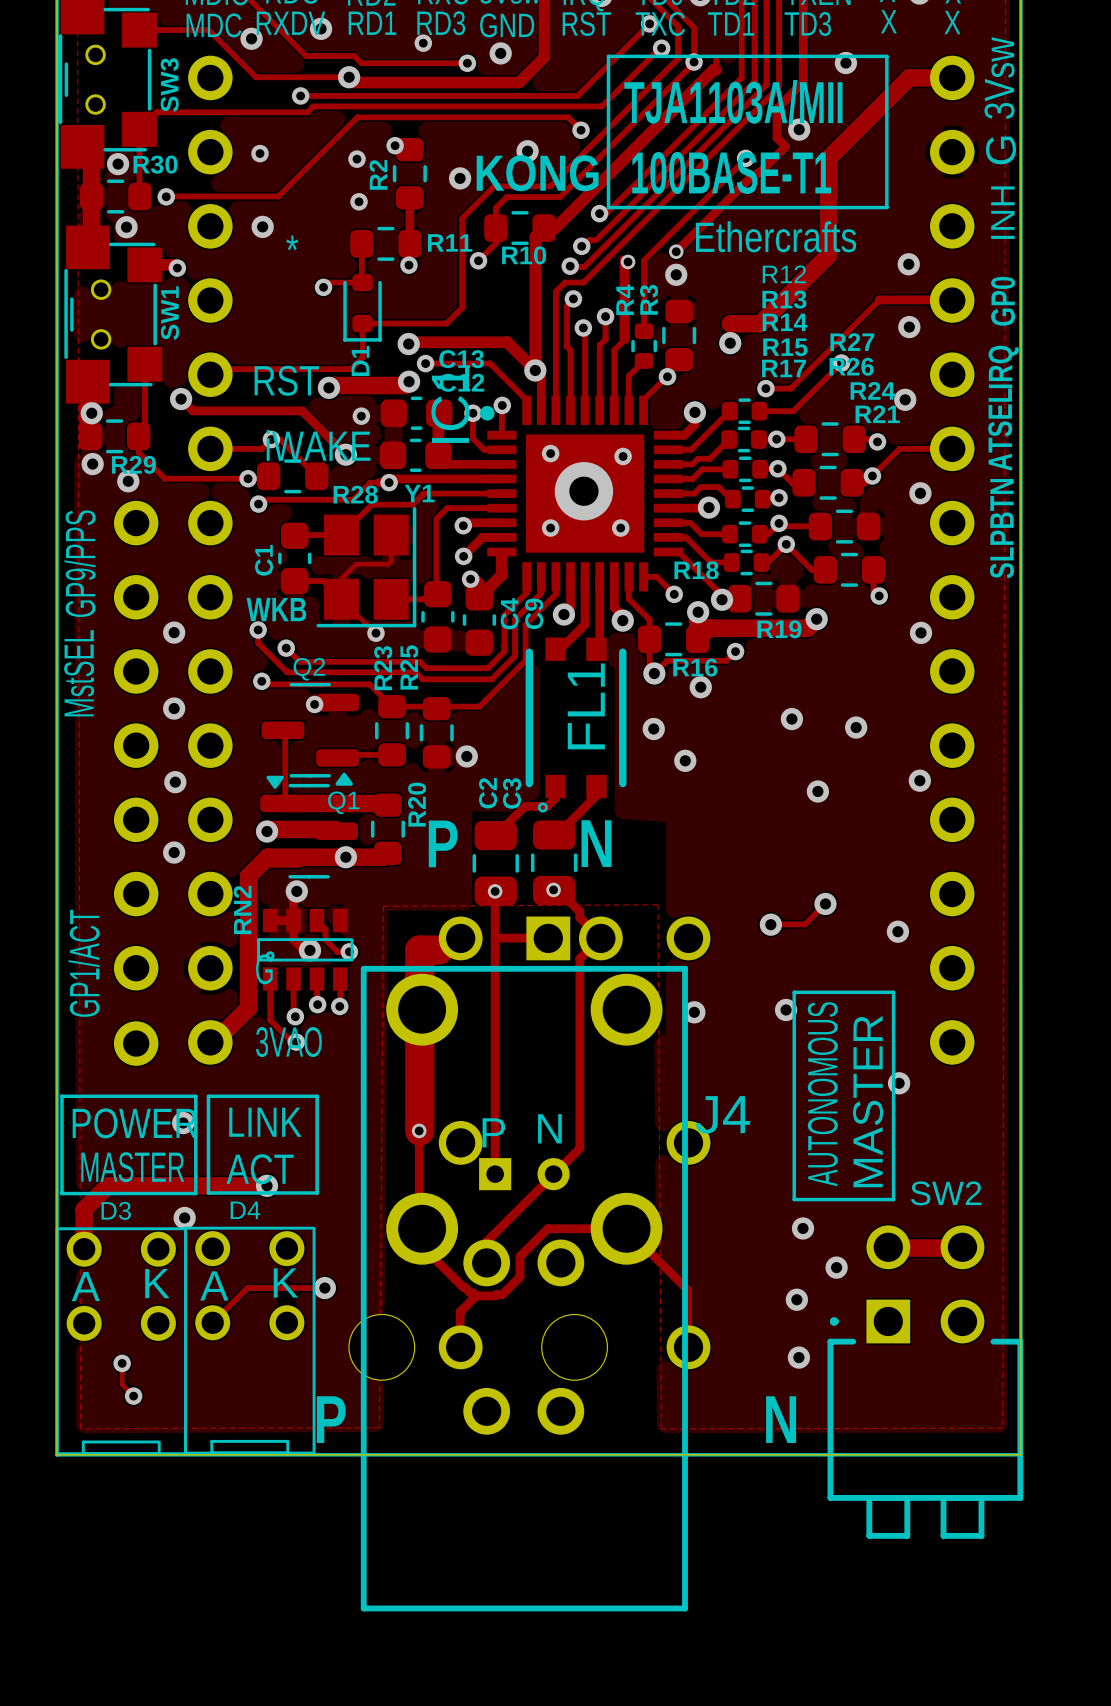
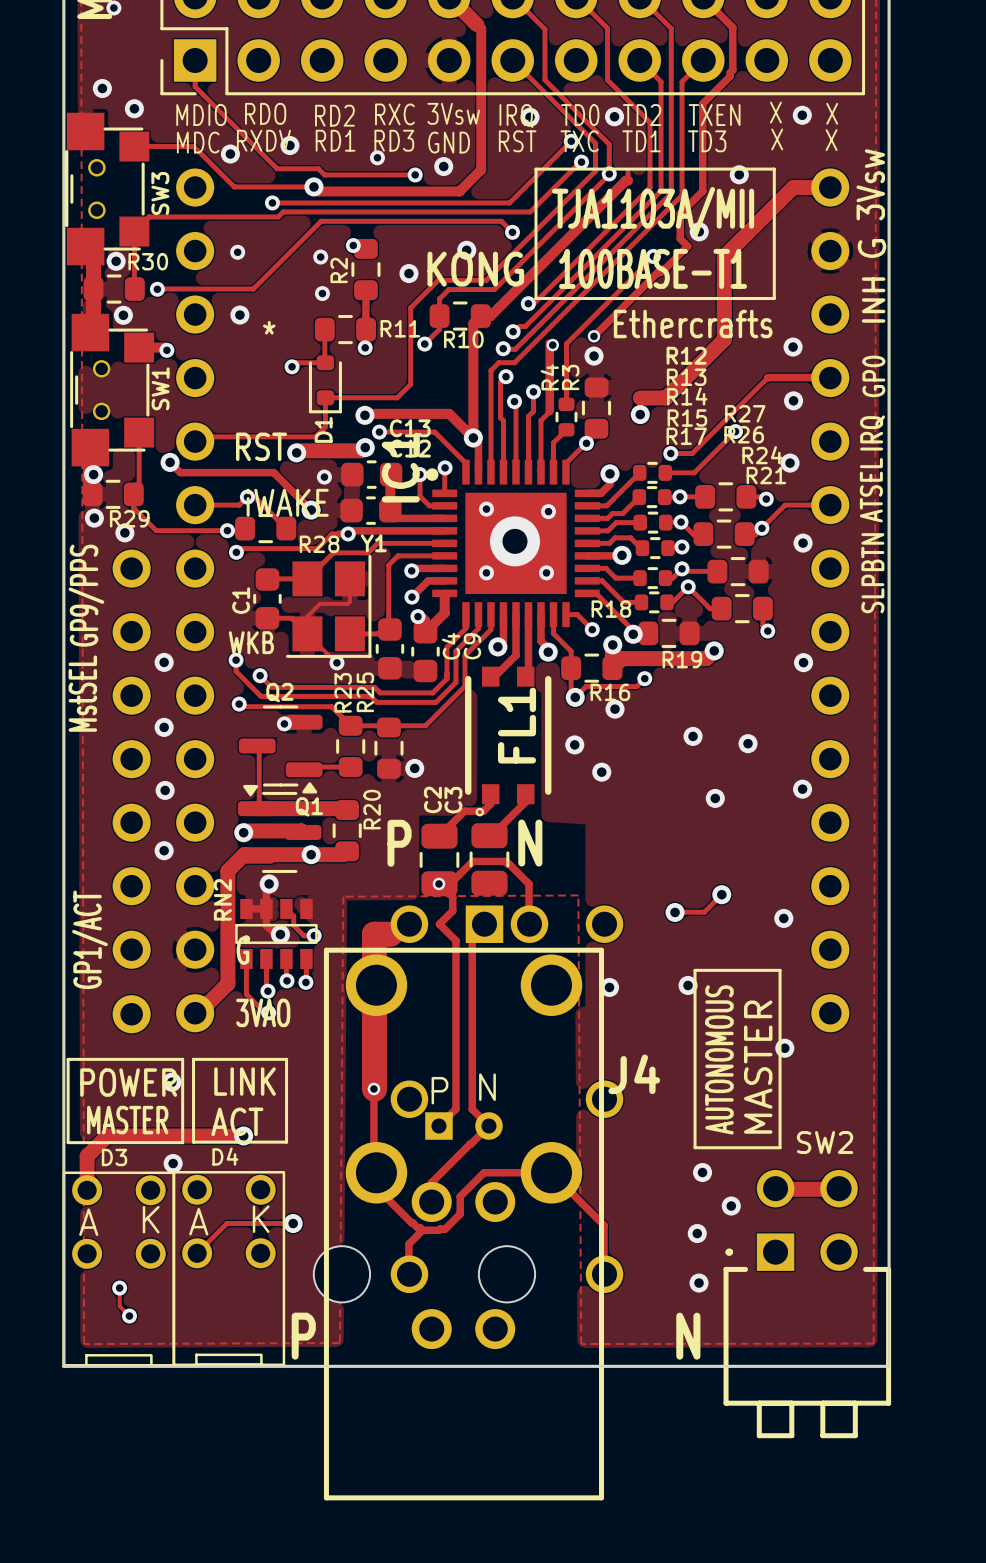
track: (553, 889) (557, 889) (579, 911) (579, 917) (600, 938) (579, 958) (579, 1148) (486, 1241) -> (484, 924) (472, 936) (472, 1109) (488, 1126) (431, 1184)
via: (553, 889) -> none
track: (495, 891) (495, 1174) -> (439, 883) (452, 896) (452, 910) (439, 924) (455, 940) (455, 1109) (438, 1126)
track: none -> (445, 888) (472, 861) (505, 861) (528, 883) (528, 923)
track: (495, 938) (547, 938) -> none

